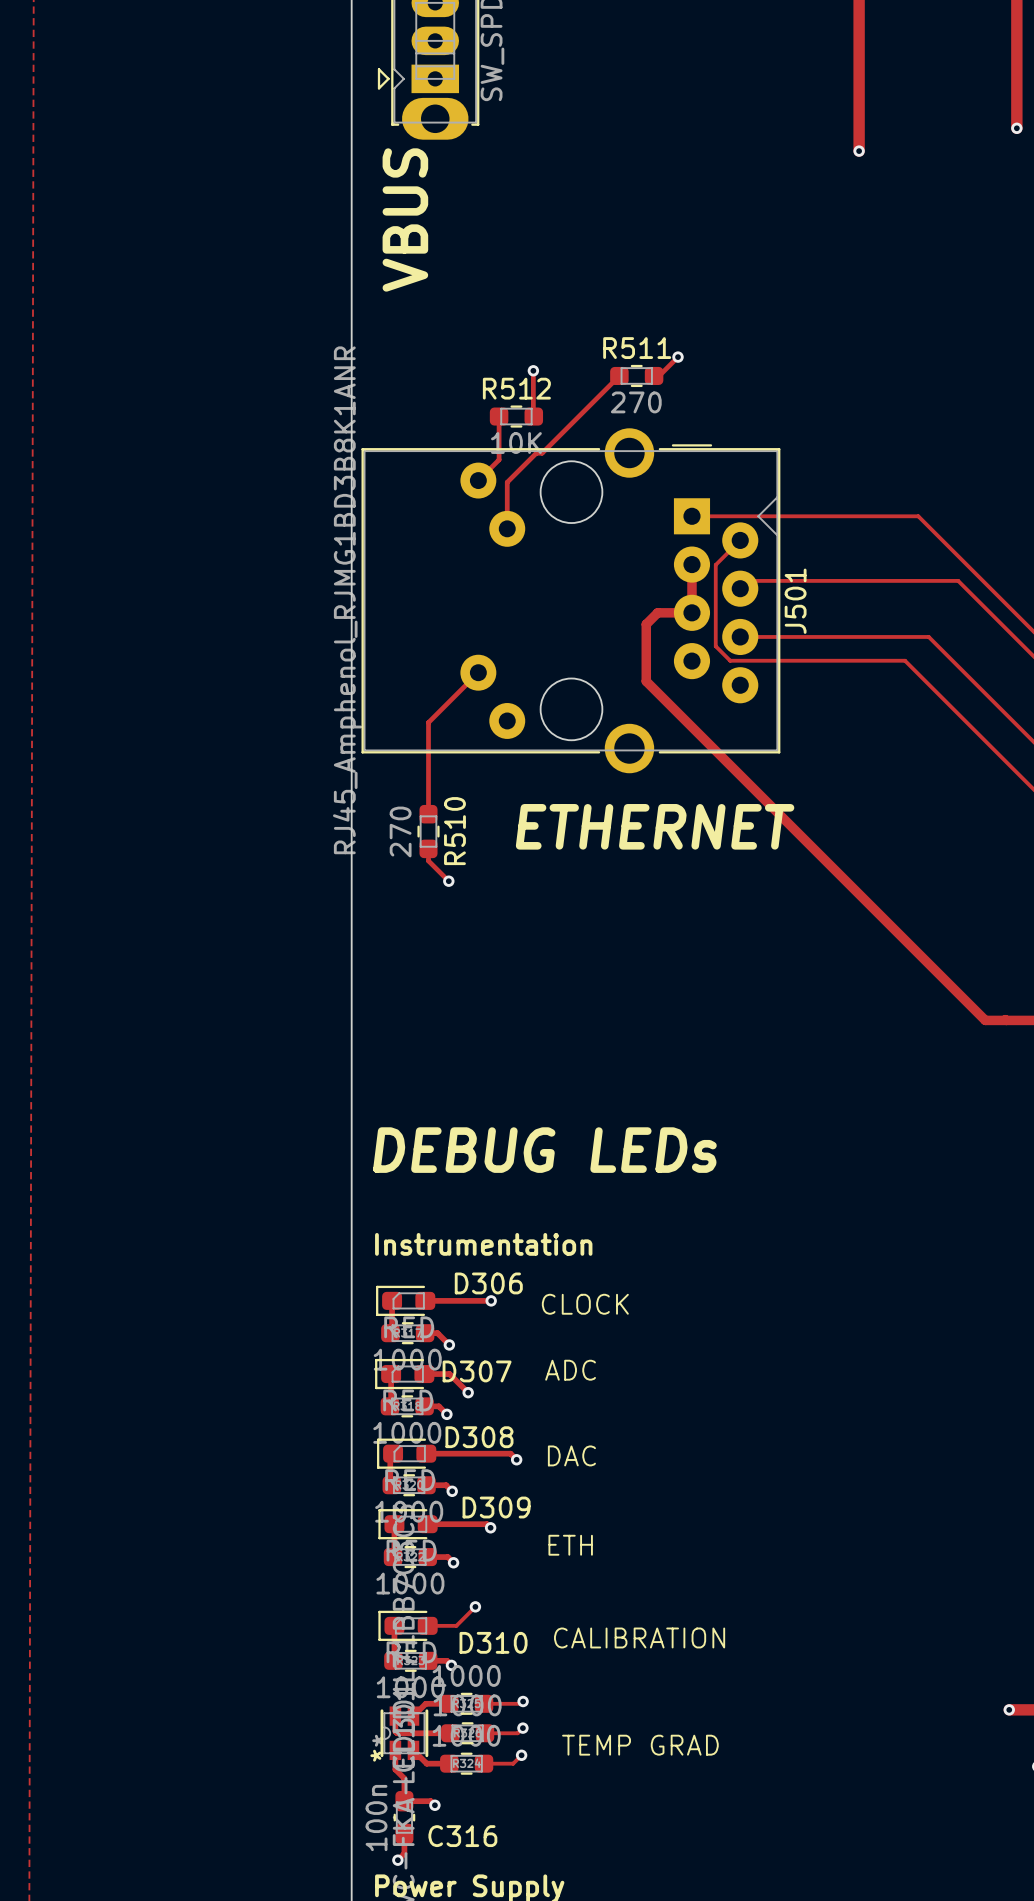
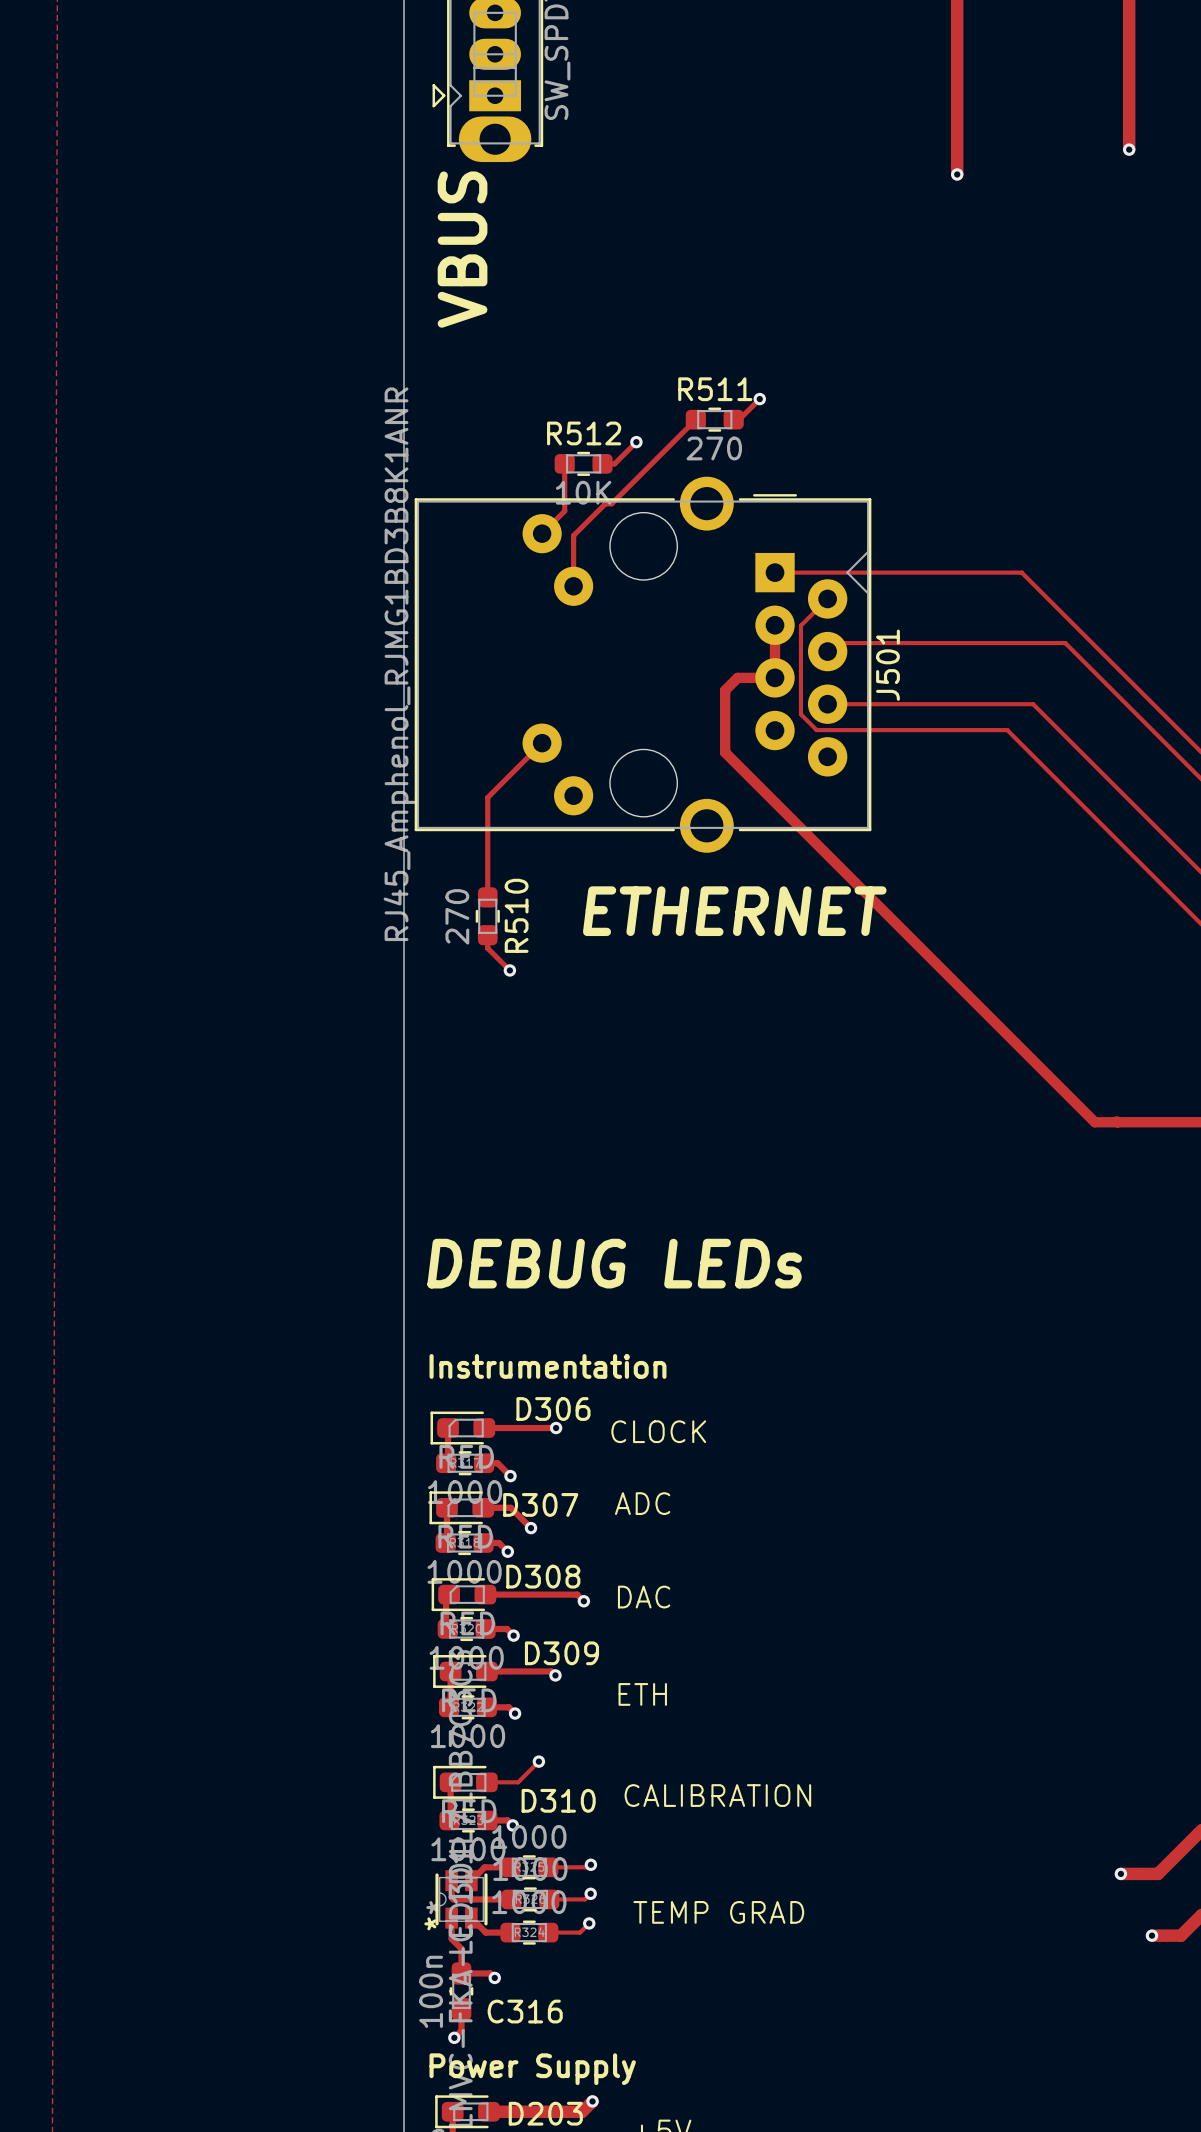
top track: (533, 370) (533, 416) -> (636, 442) (614, 463) (602, 463)
via position: (533, 370) -> (636, 442)

